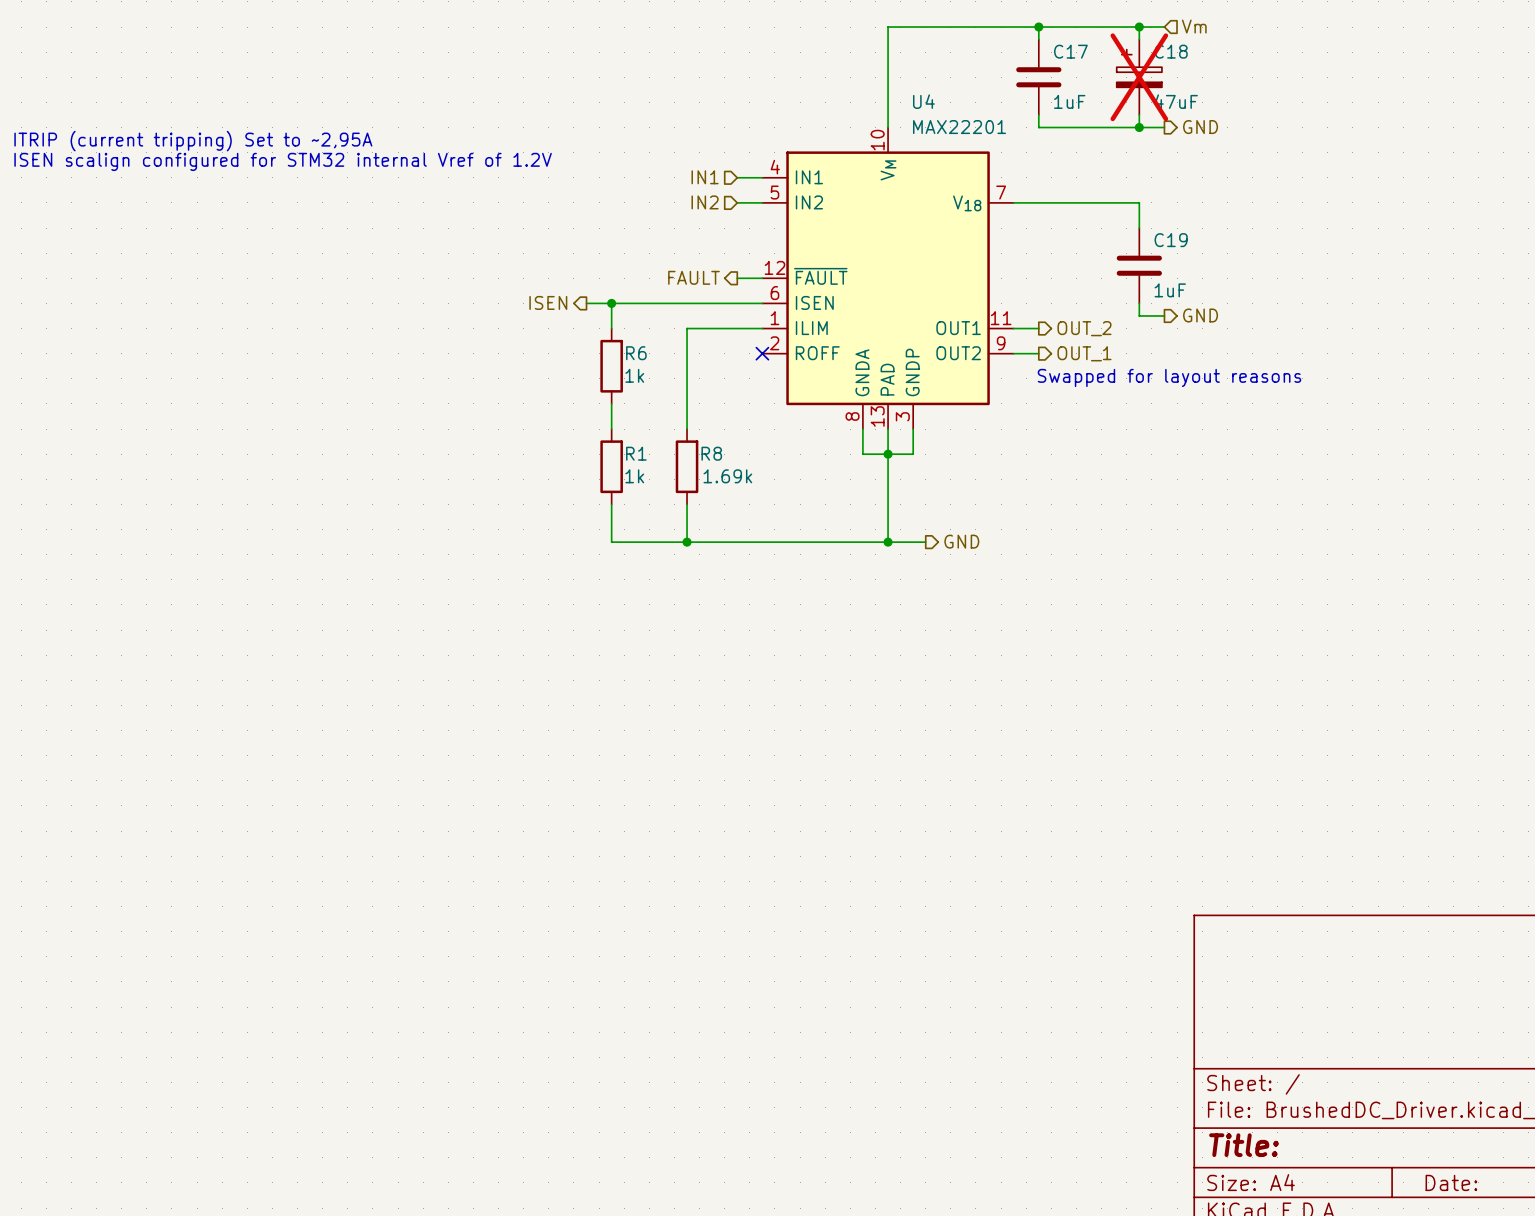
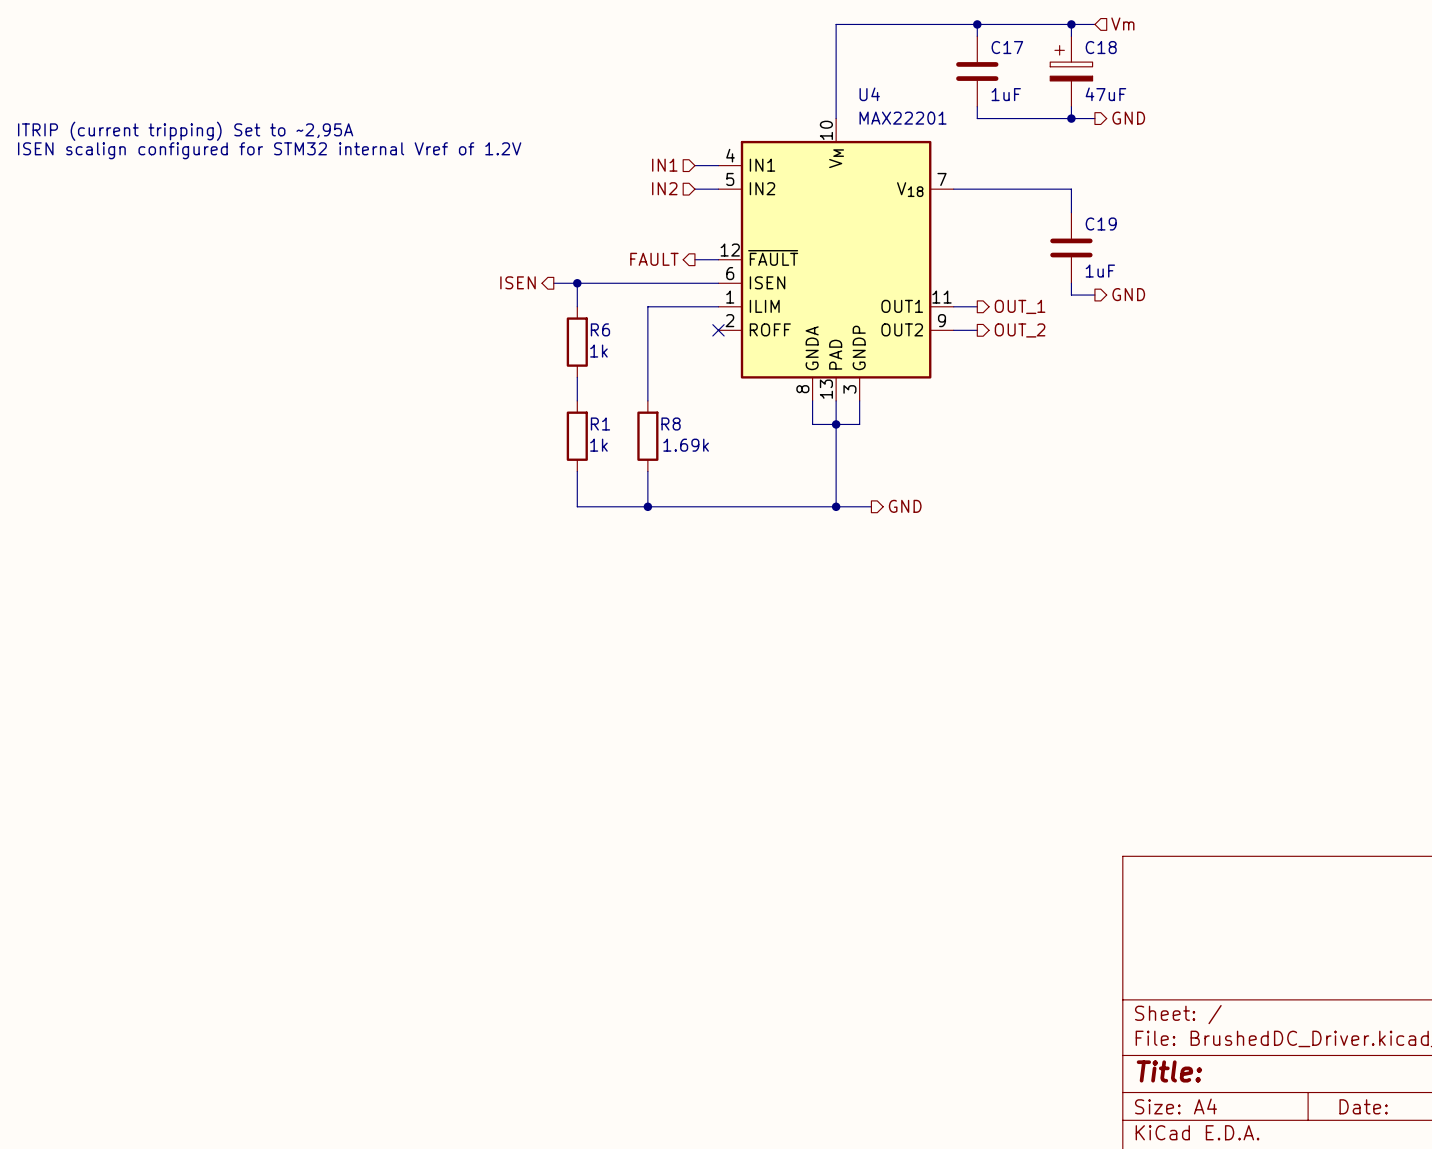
C18 do-not-place cross: (1139, 77) -> none
hierarchical label: OUT_2 (1084, 328) -> OUT_1 (1020, 306)
hierarchical label: OUT_1 (1084, 353) -> OUT_2 (1020, 330)
text: Swapped for layout reasons (1169, 377) -> none

